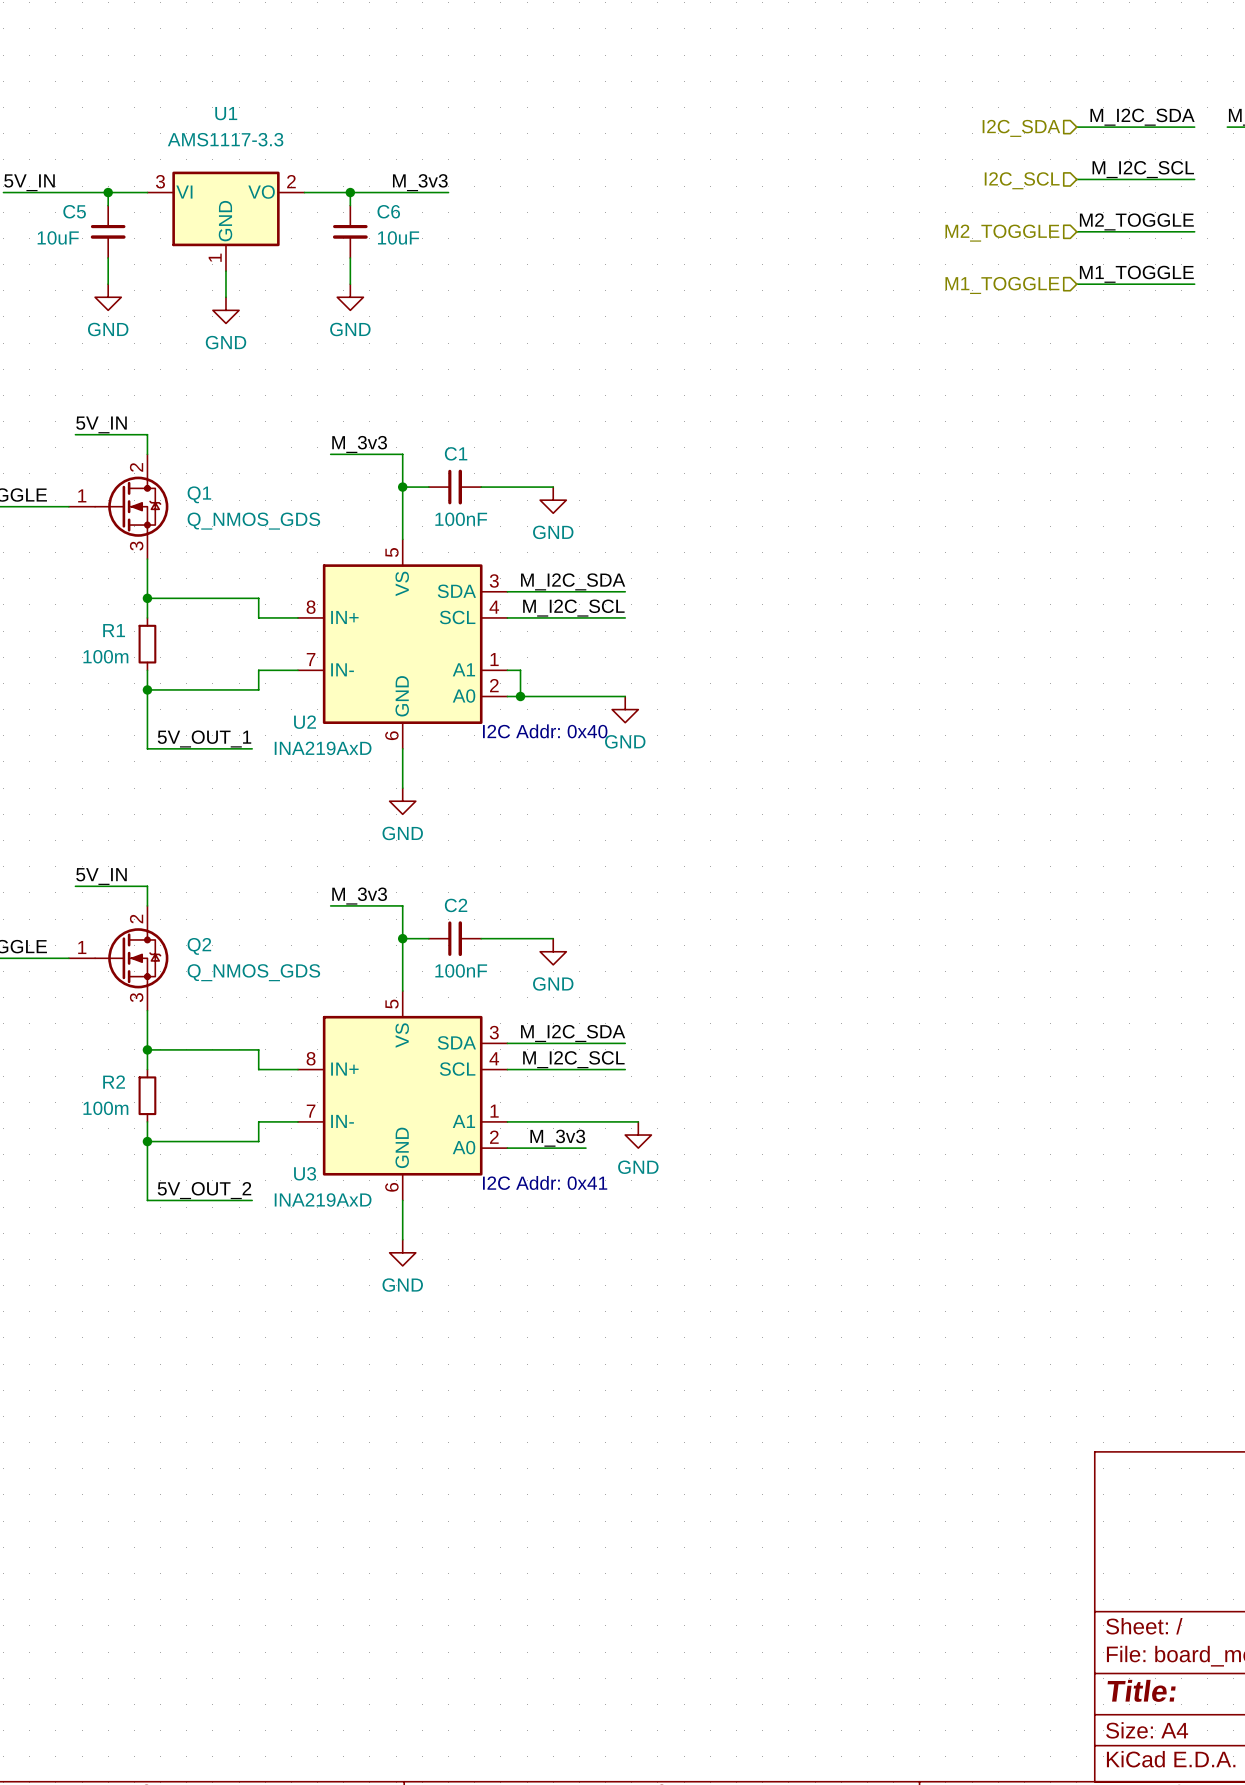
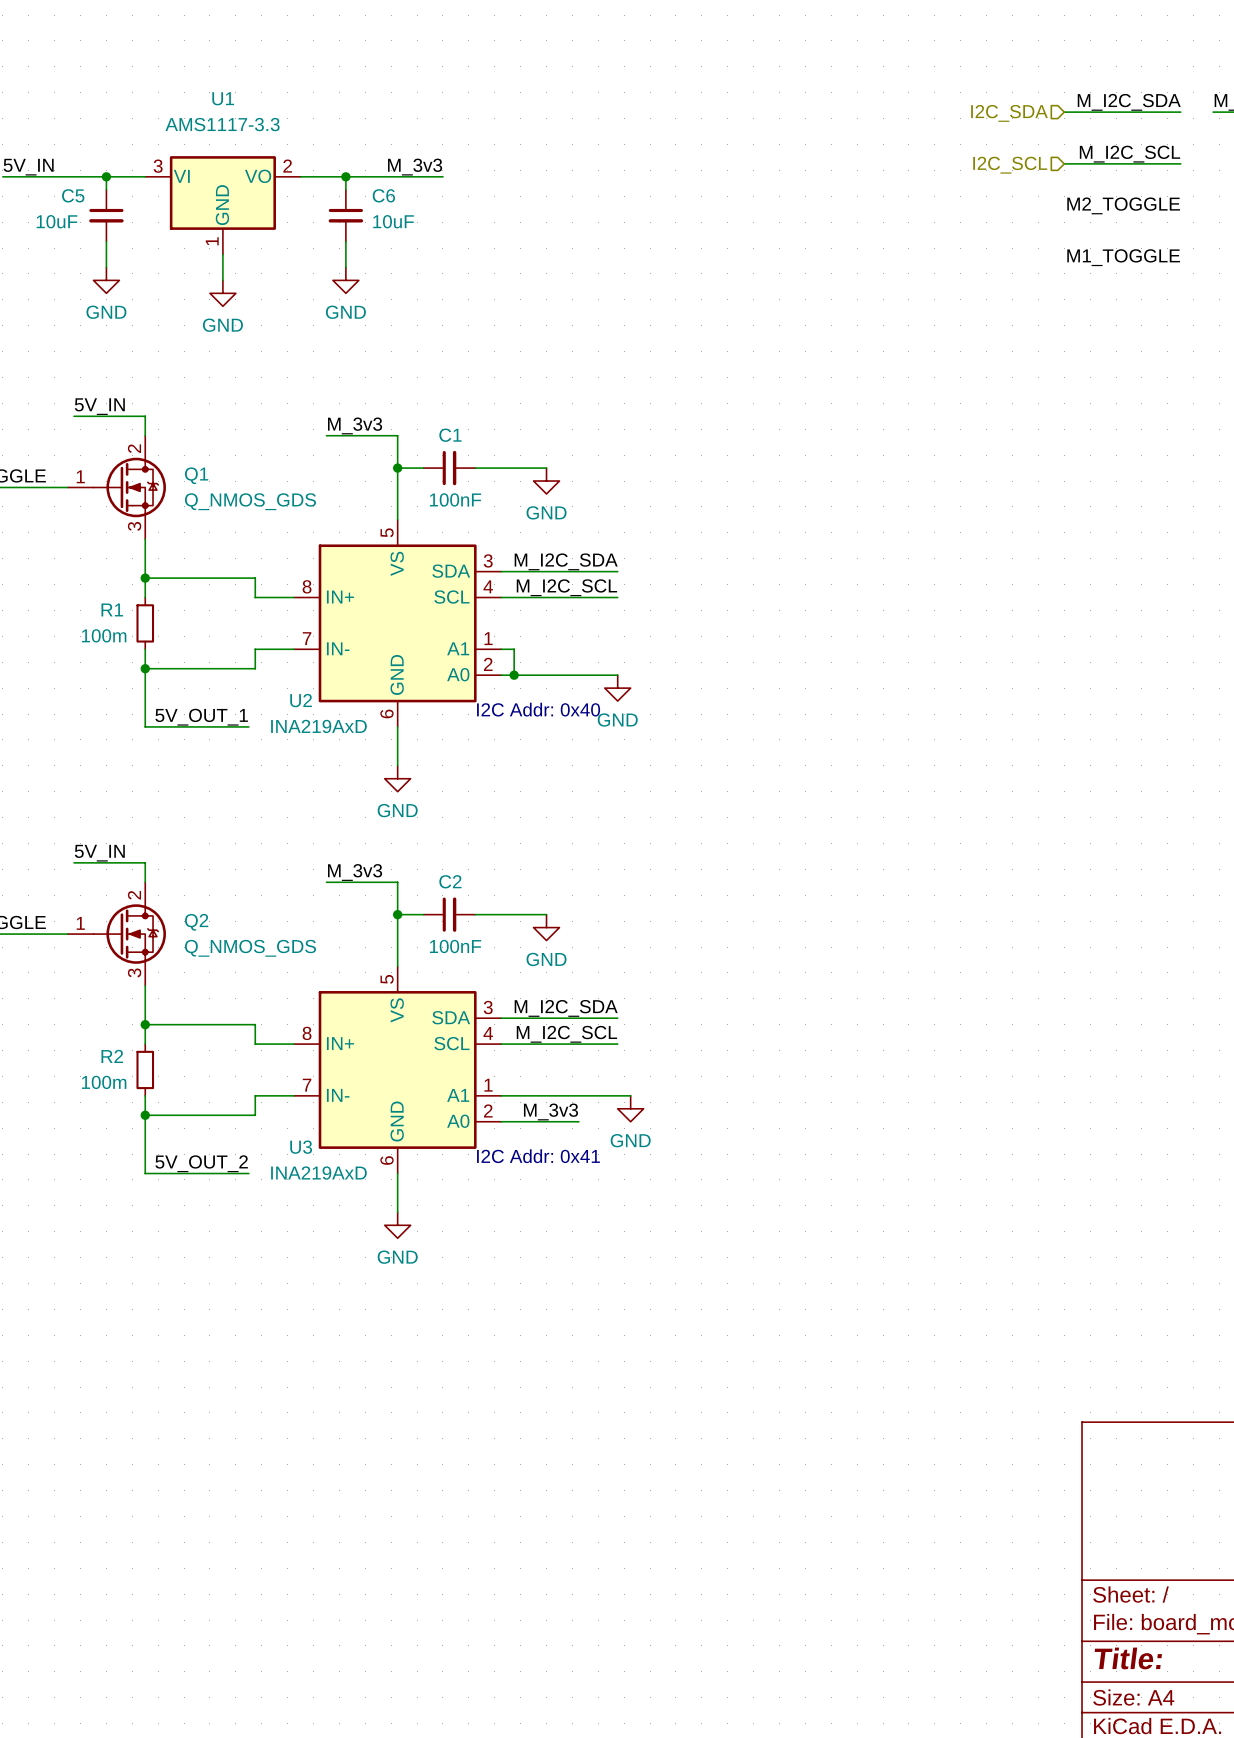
wire: (1076, 231) (1194, 231) -> none
hierarchical label: M2_TOGGLE (1002, 233) -> none
wire: (1076, 284) (1194, 284) -> none
hierarchical label: M1_TOGGLE (1002, 285) -> none

